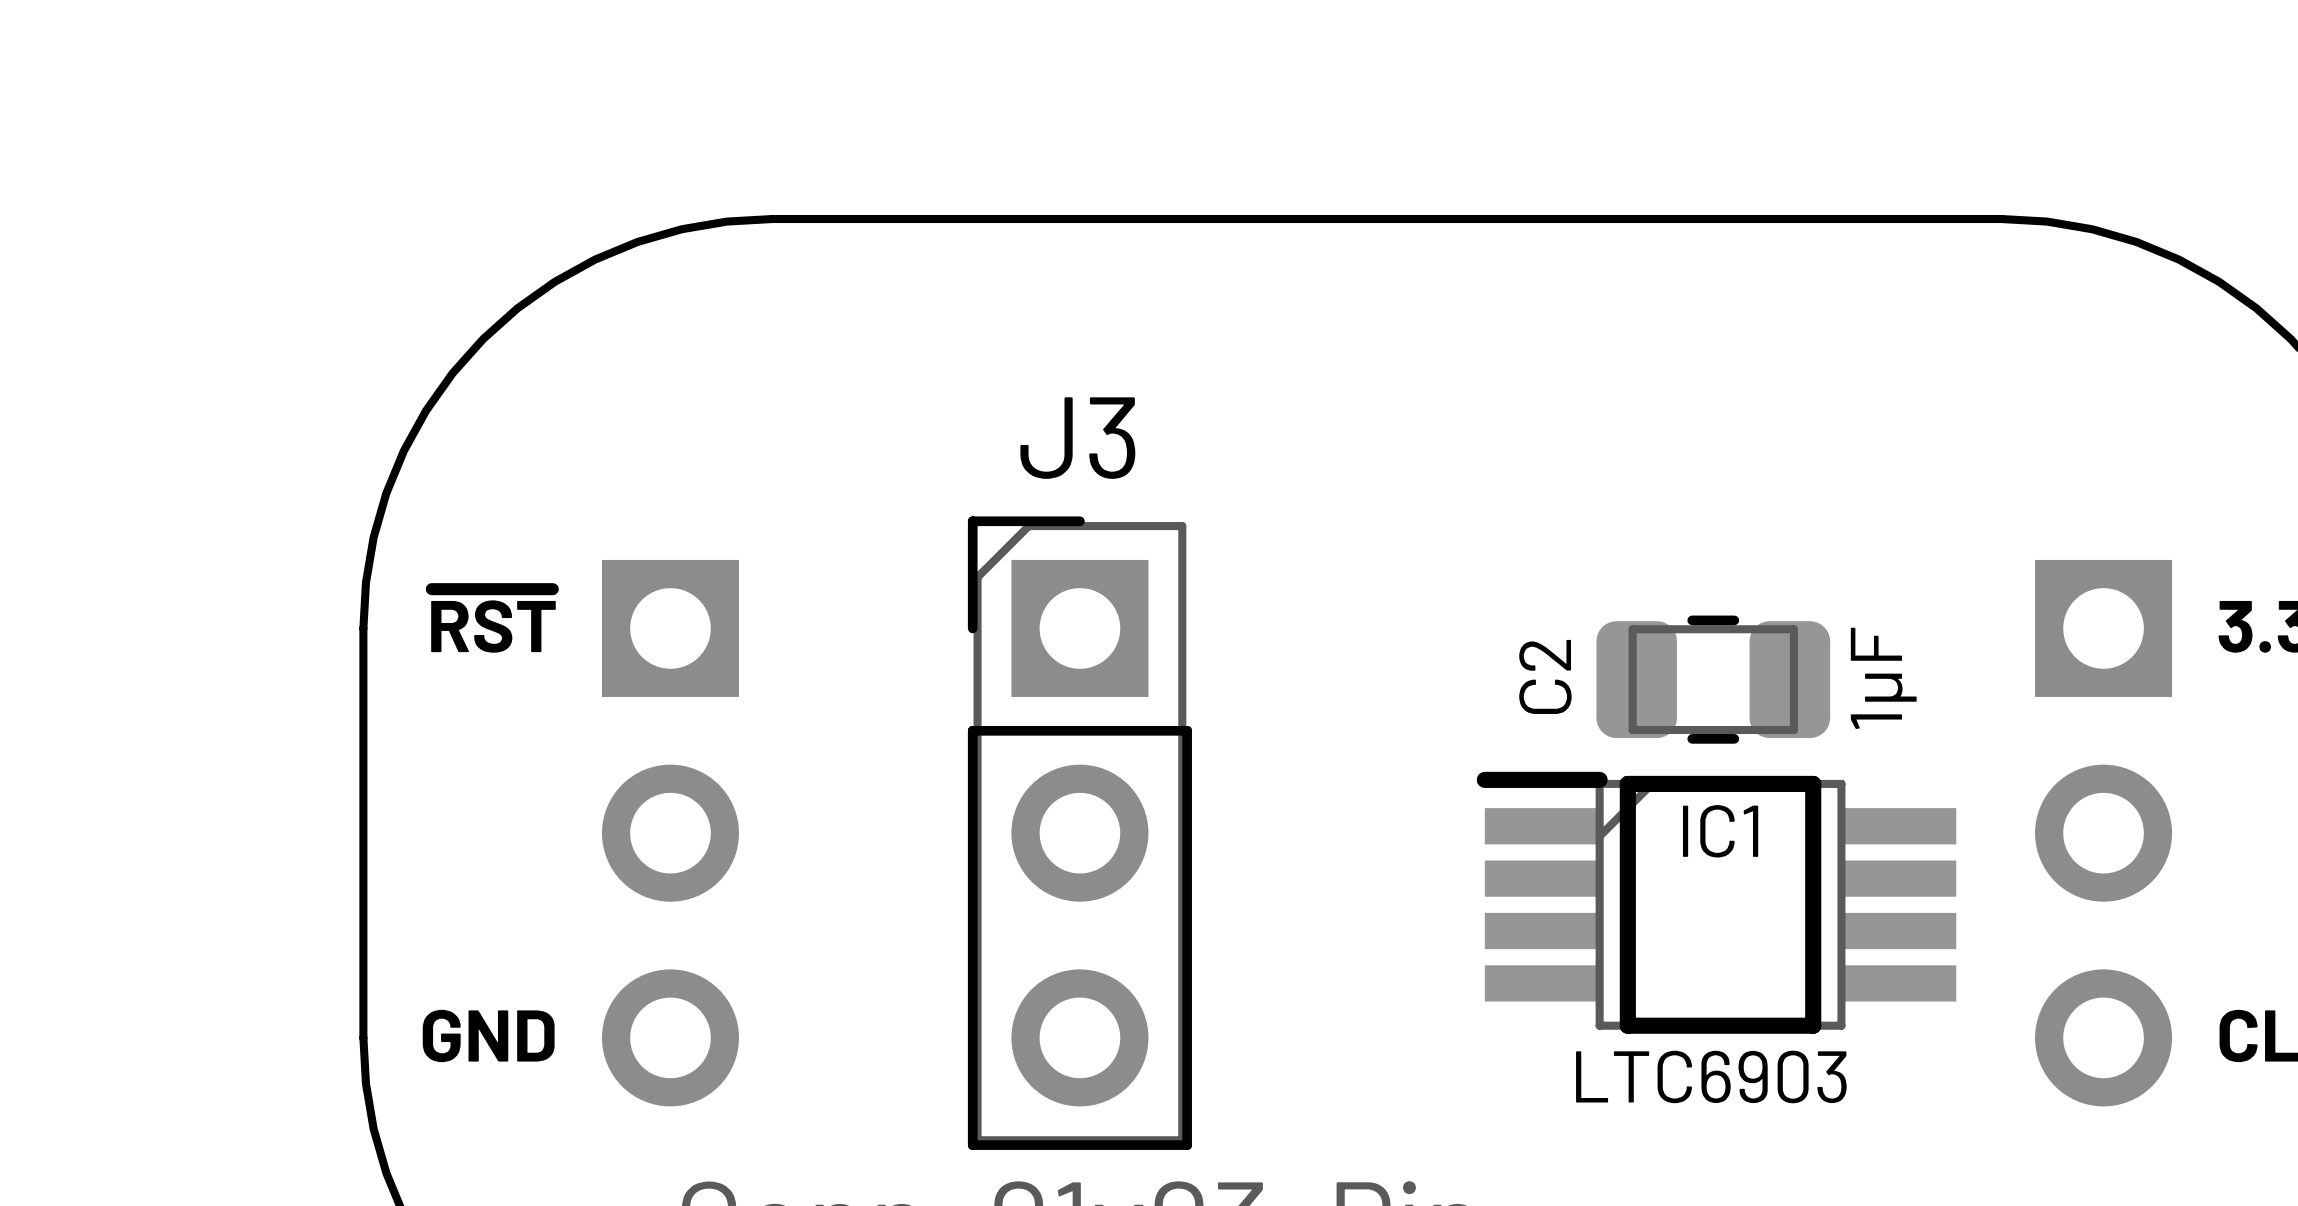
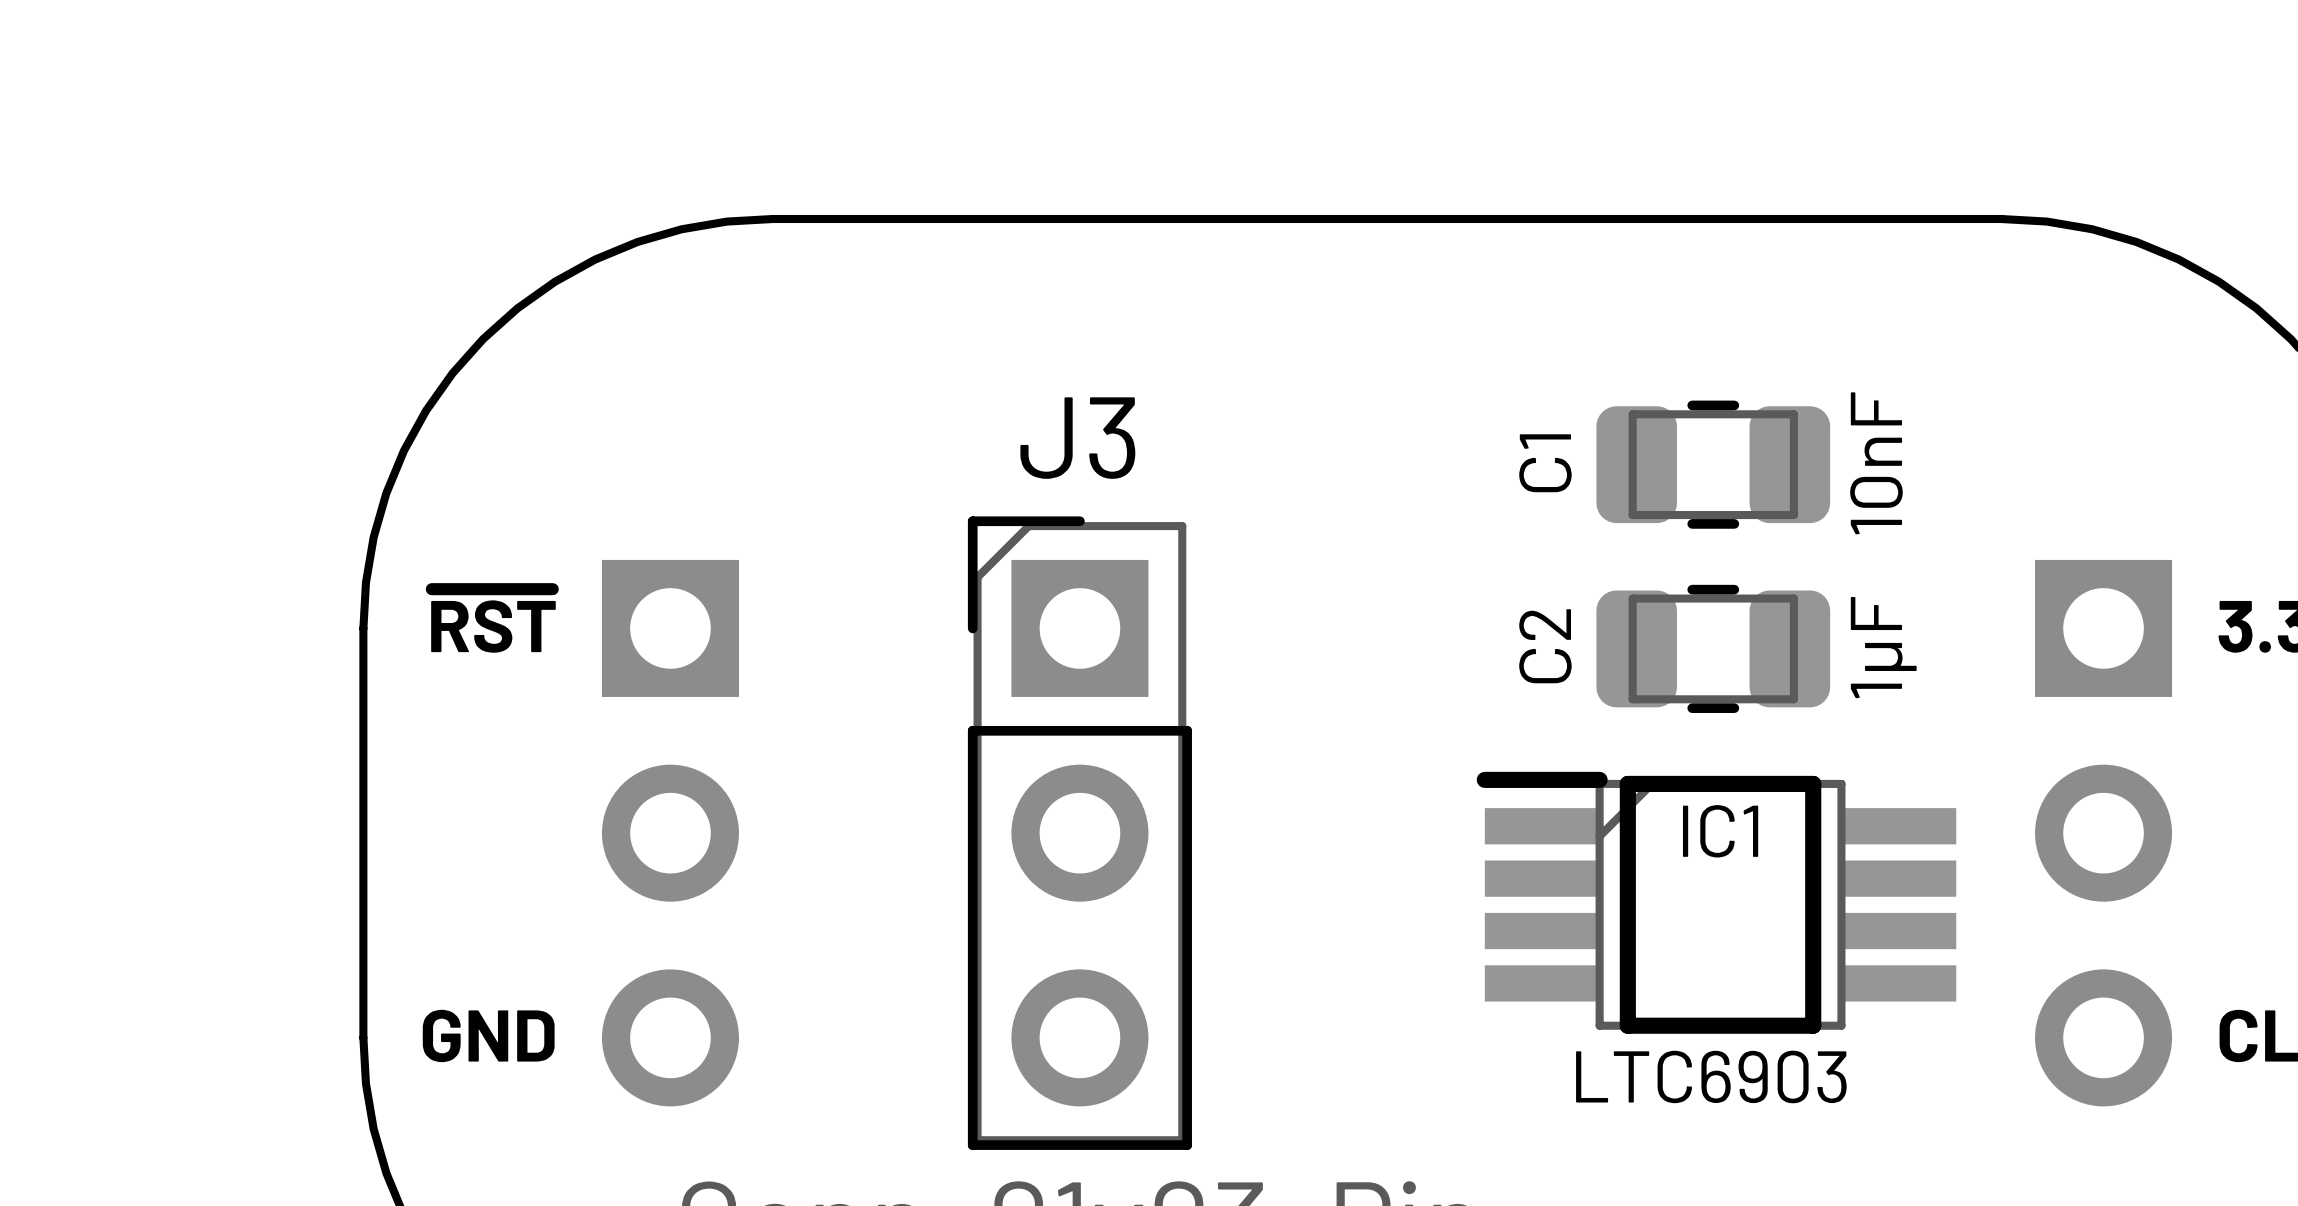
C1: none -> 10nF (1713, 464)
C2 position: (1713, 679) -> (1713, 648)

